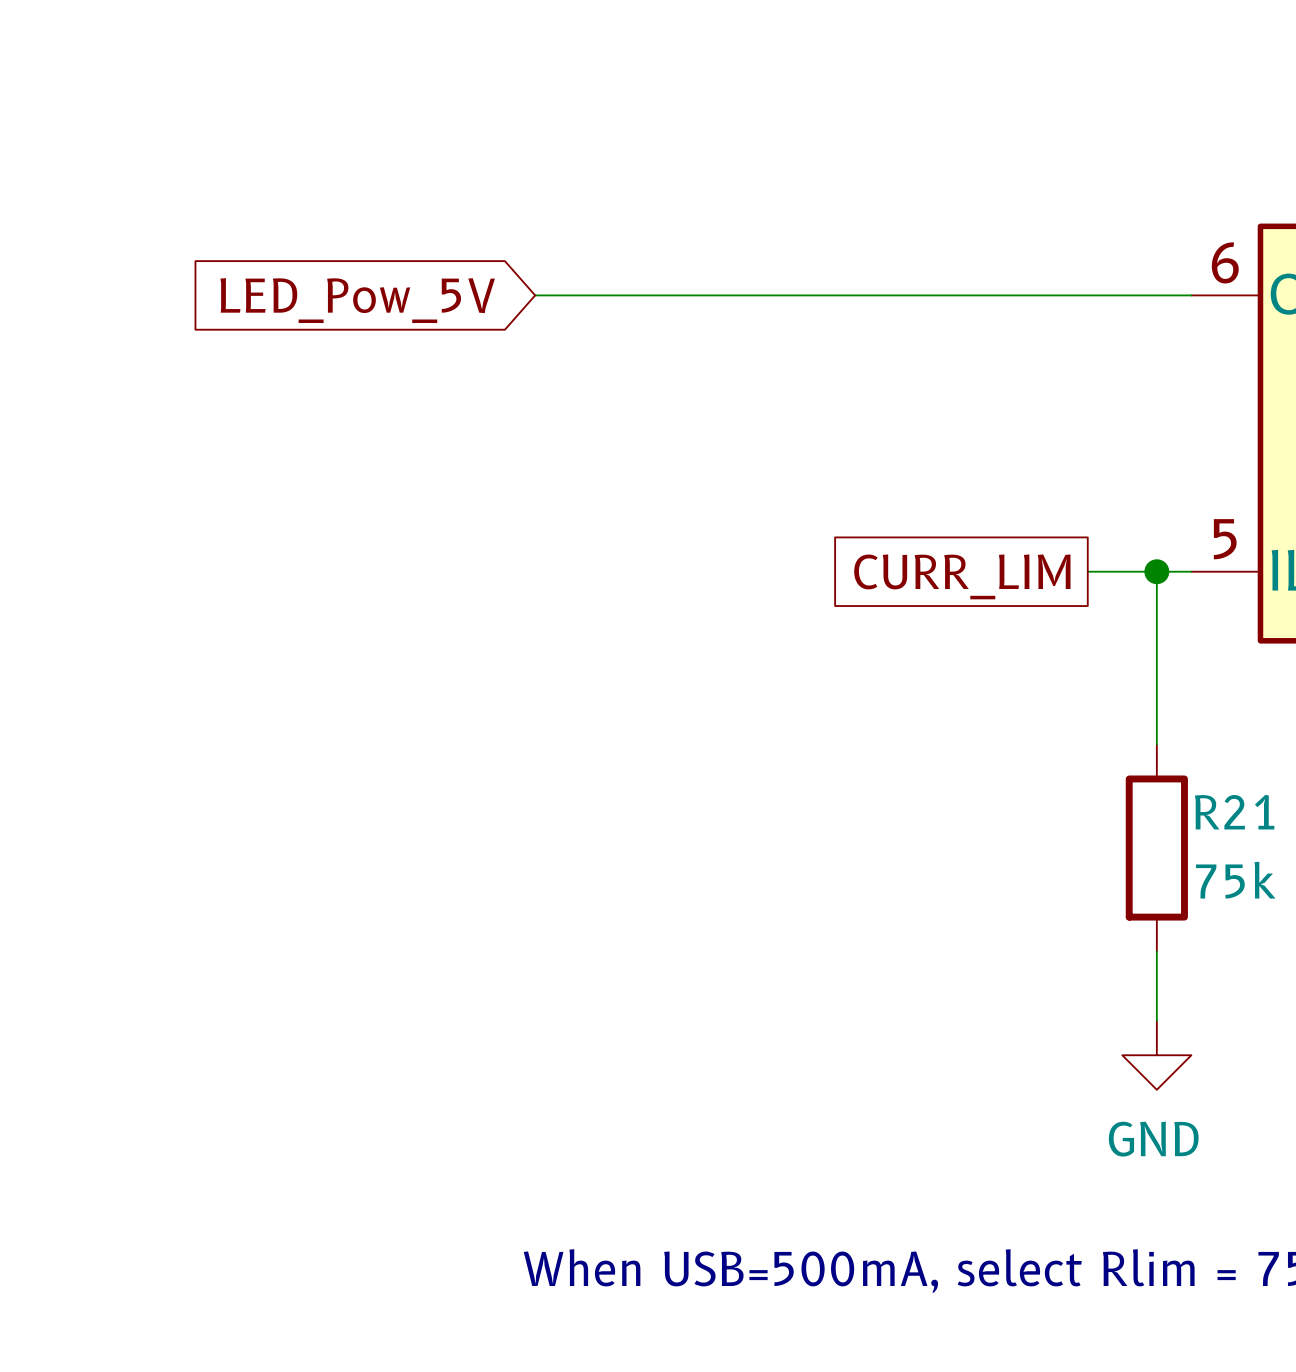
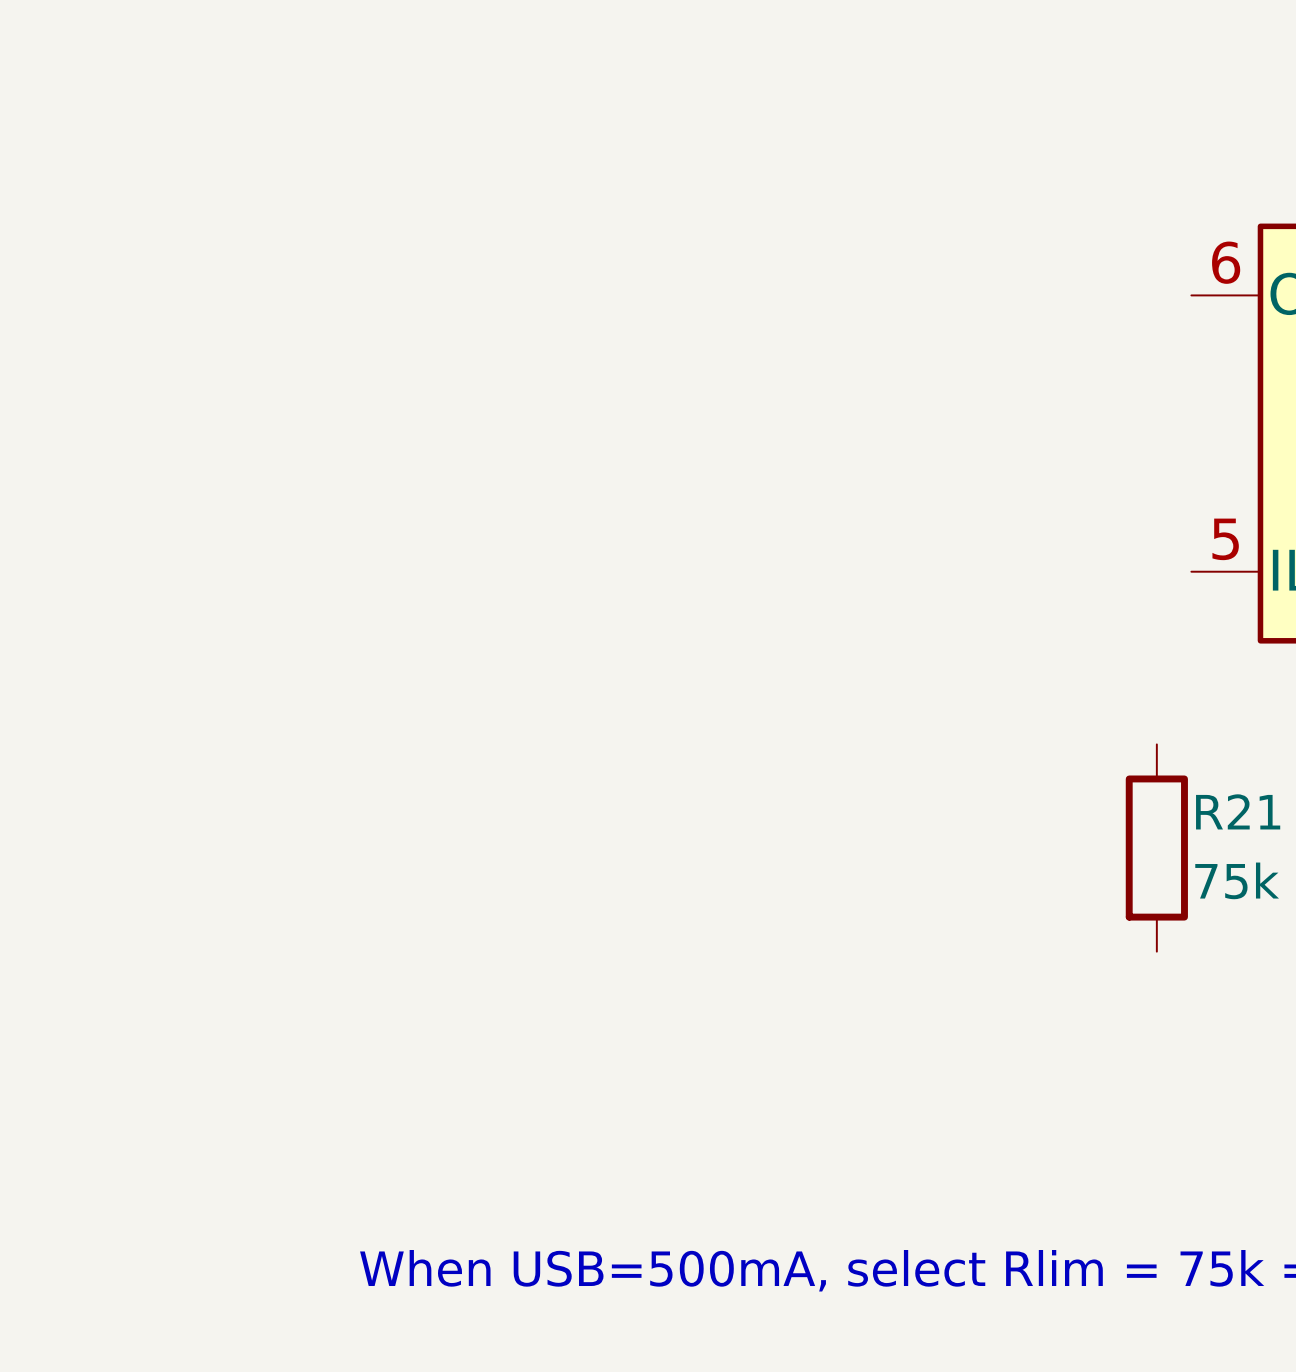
wire: (535, 295) (1191, 295) -> none
global label: LED_Pow_5V (357, 300) -> none
wire: (1087, 571) (1191, 571) -> none
wire: (1156, 571) (1156, 744) -> none
junction: (1156, 571) -> none
global label: CURR_LIM (962, 576) -> none
wire: (1156, 951) (1156, 1020) -> none
power symbol: GND (1156, 1055) -> none

